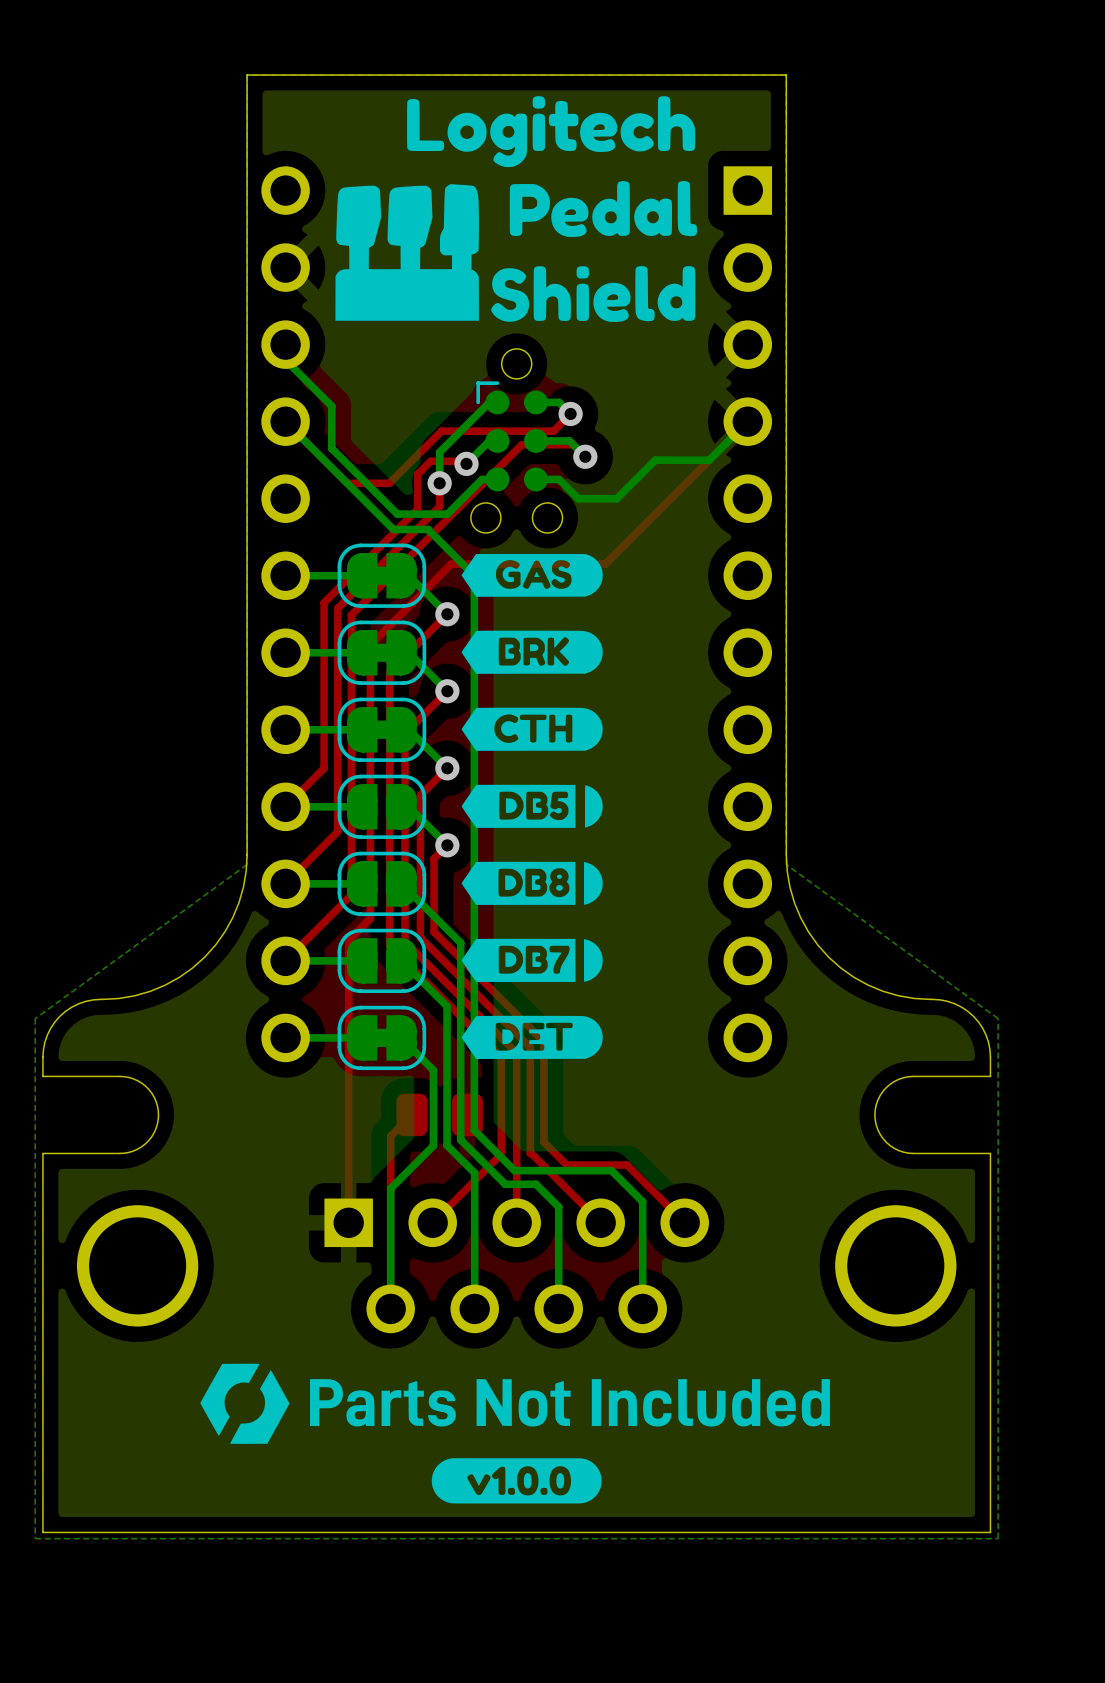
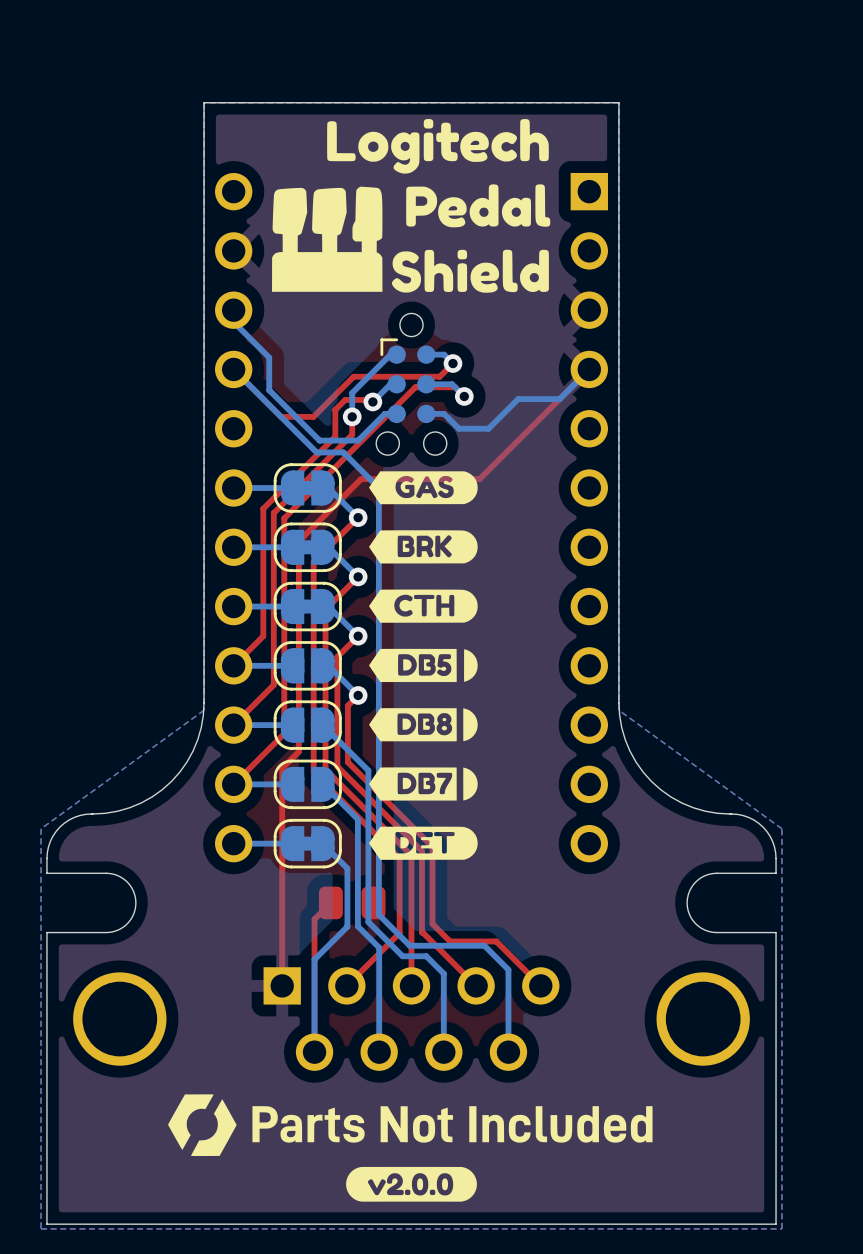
drawing shape: [431, 1458, 602, 1504] -> [346, 1166, 477, 1202]

